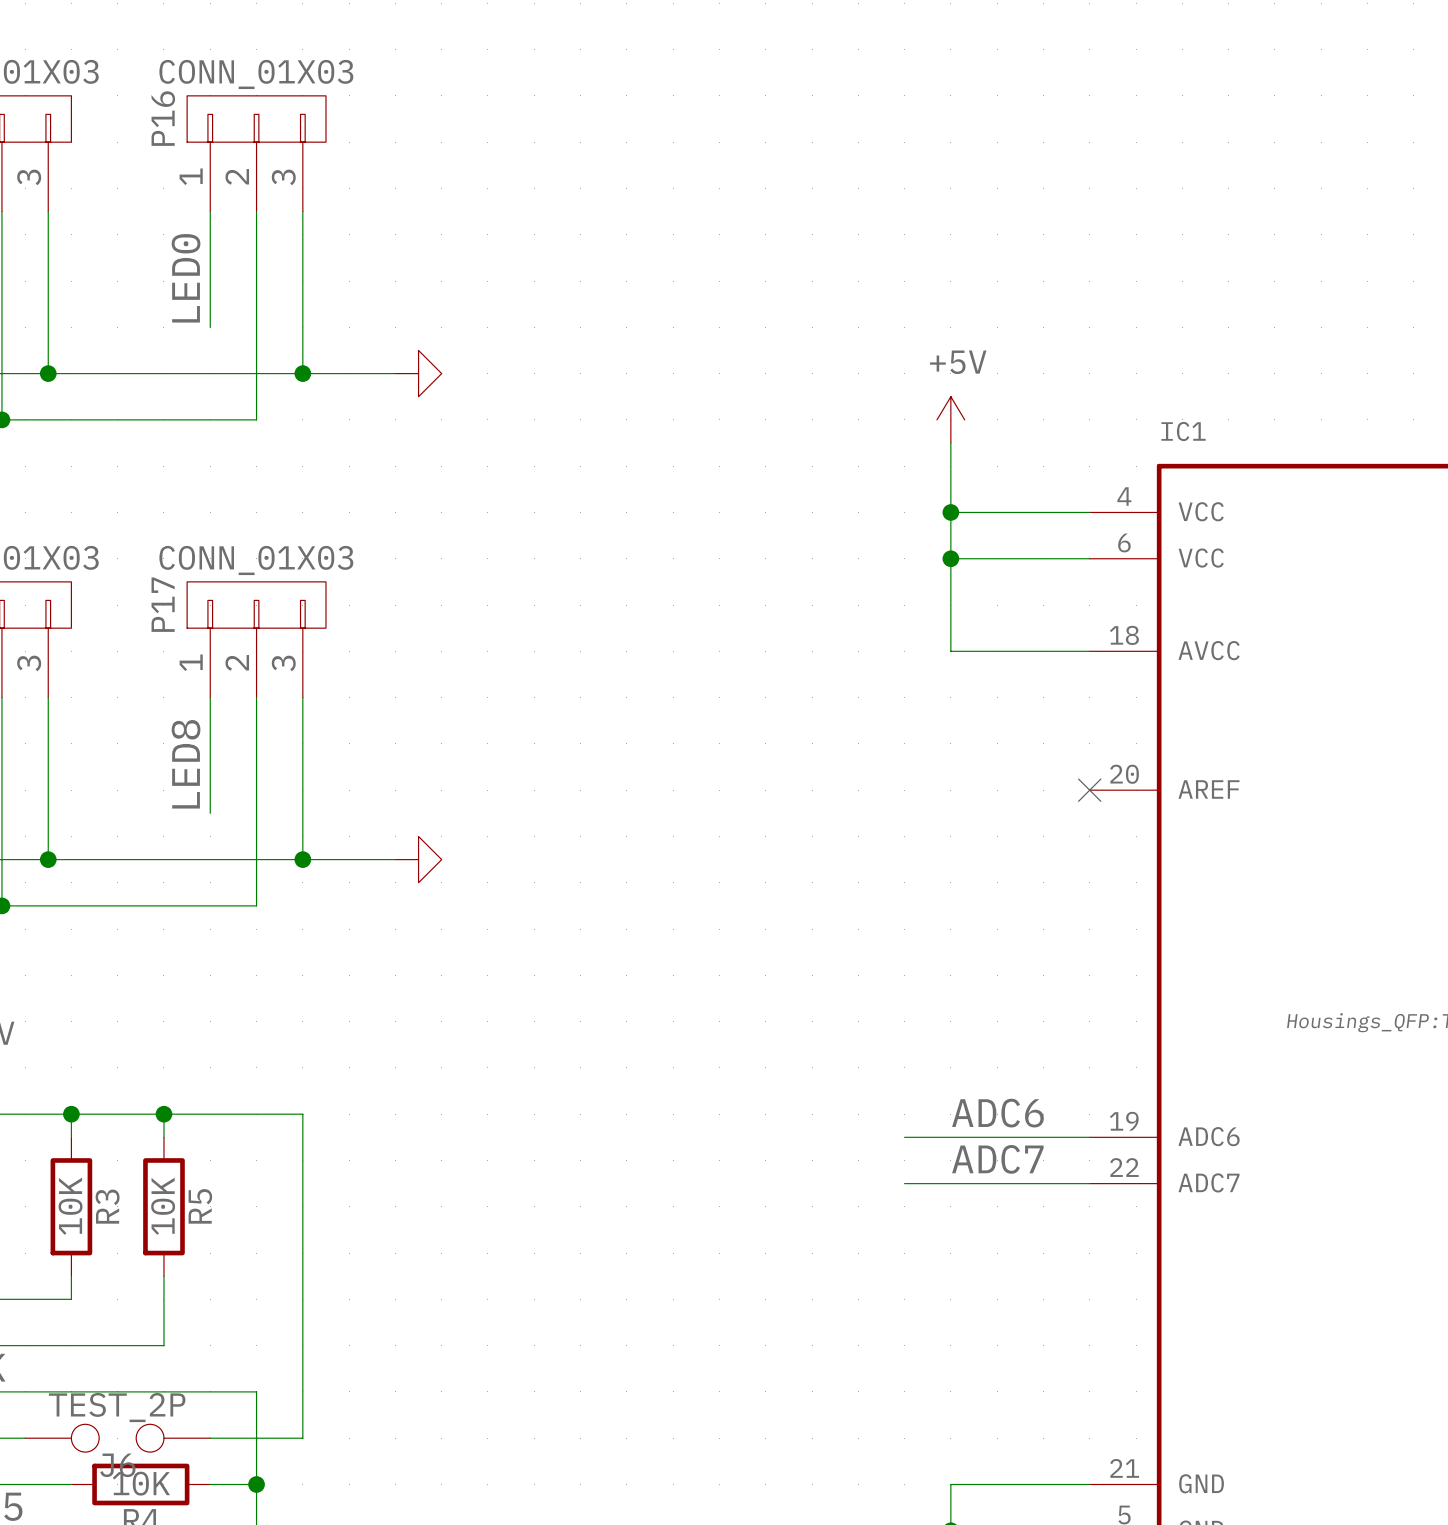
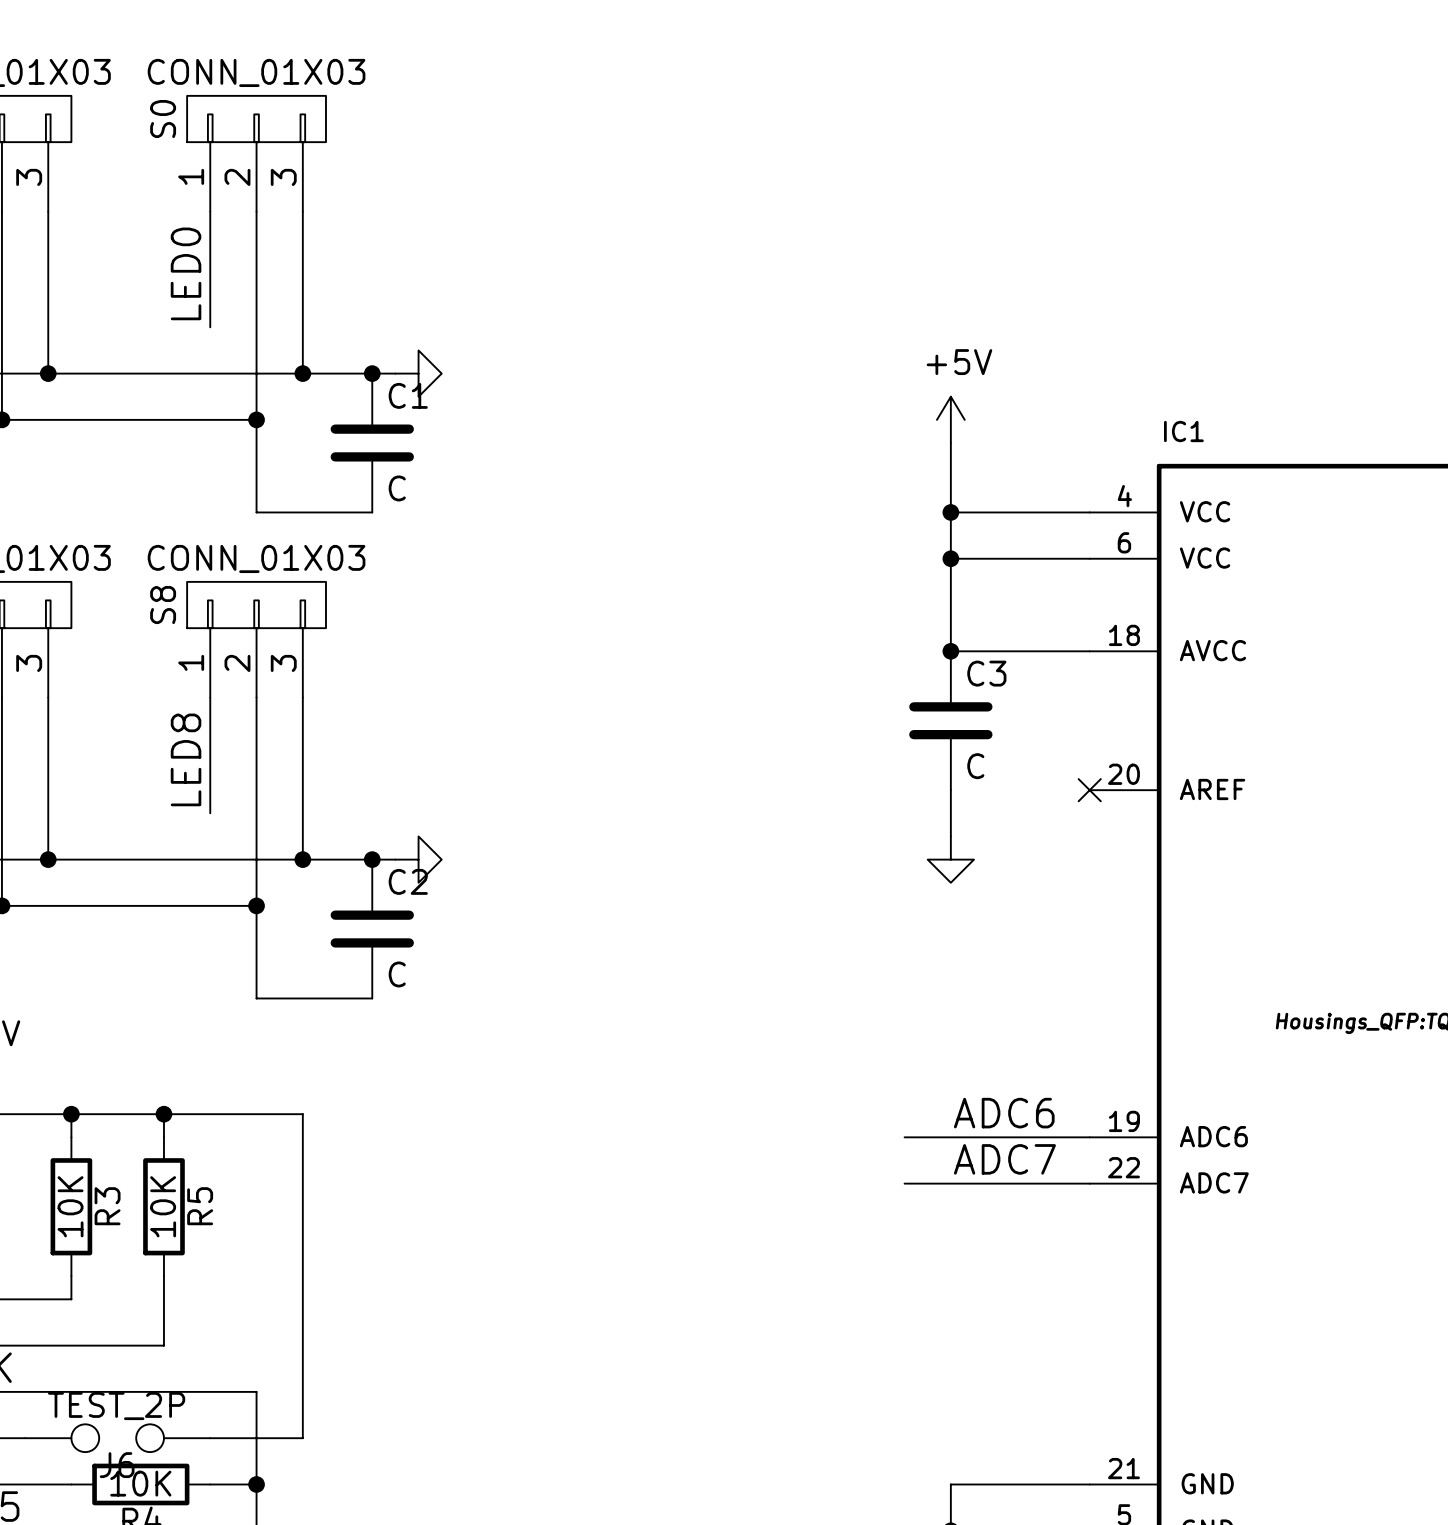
P16 name: P16 (163, 118) -> S0 (163, 119)
junction: none -> (372, 373)
wire: none -> (256, 419) (256, 512) (372, 512)
junction: none -> (256, 419)
C1: none -> C (372, 443)
P17 name: P17 (163, 604) -> S8 (163, 605)
junction: none -> (950, 651)
C3: none -> C (950, 720)
wire: none -> (950, 790) (950, 836)
junction: none -> (372, 859)
power symbol: none -> (950, 859)
wire: none -> (256, 905) (256, 998) (372, 998)
junction: none -> (256, 905)
C2: none -> C (372, 929)

